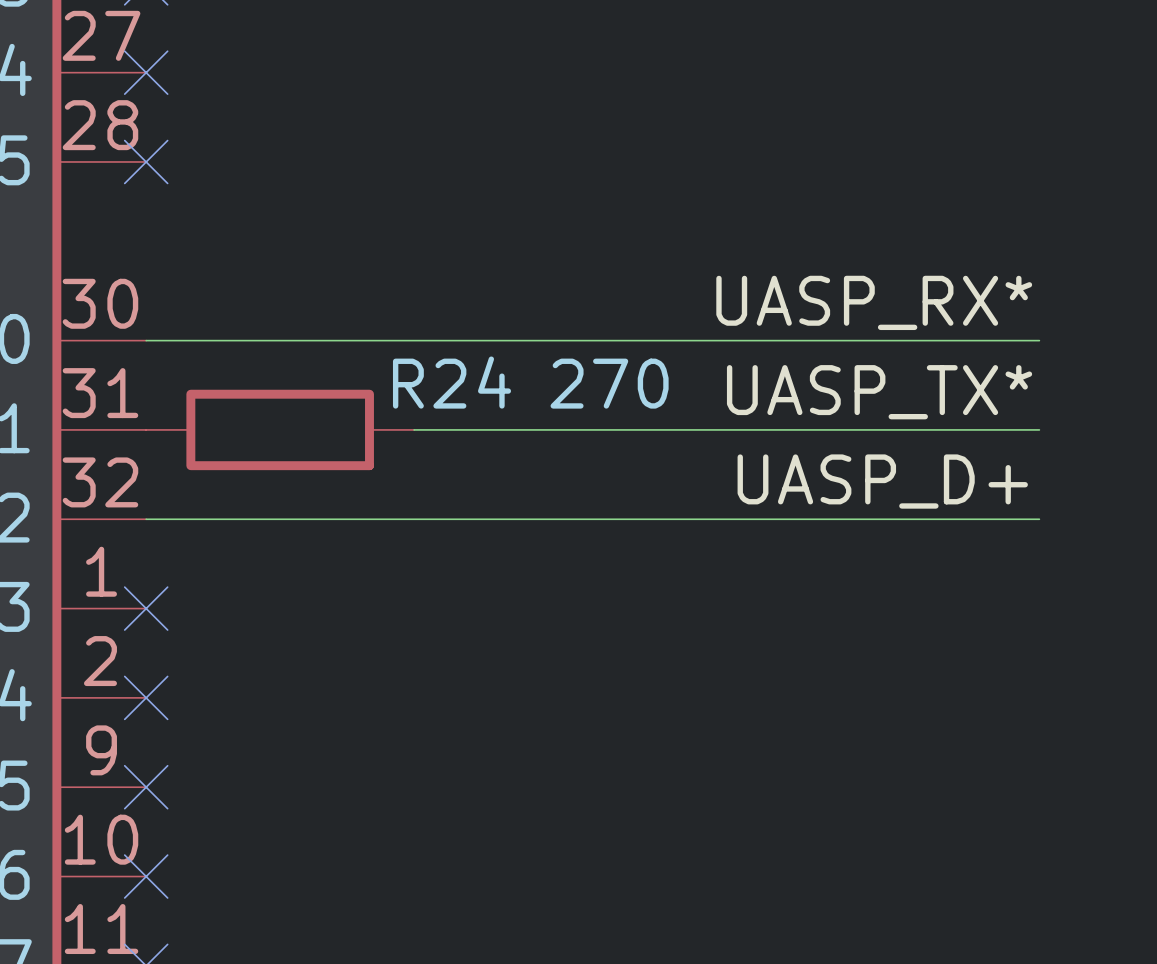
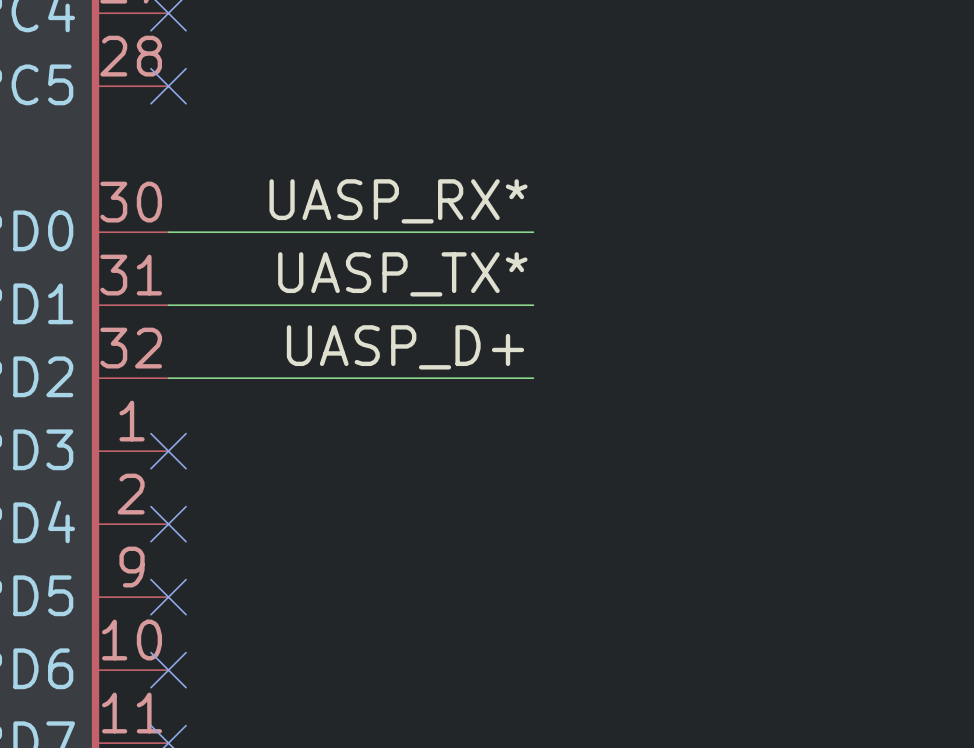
label position: UASP_RX* (874, 302) -> UASP_RX* (398, 201)
wire: (592, 340) (1039, 340) -> none
label position: UASP_TX* (879, 392) -> UASP_TX* (402, 274)
wire: none -> (168, 305) (387, 305)
R24: 270 (280, 429) -> none
wire: (592, 429) (1039, 429) -> none
label position: UASP_D+ (882, 481) -> UASP_D+ (405, 347)
wire: (592, 519) (1039, 519) -> none

